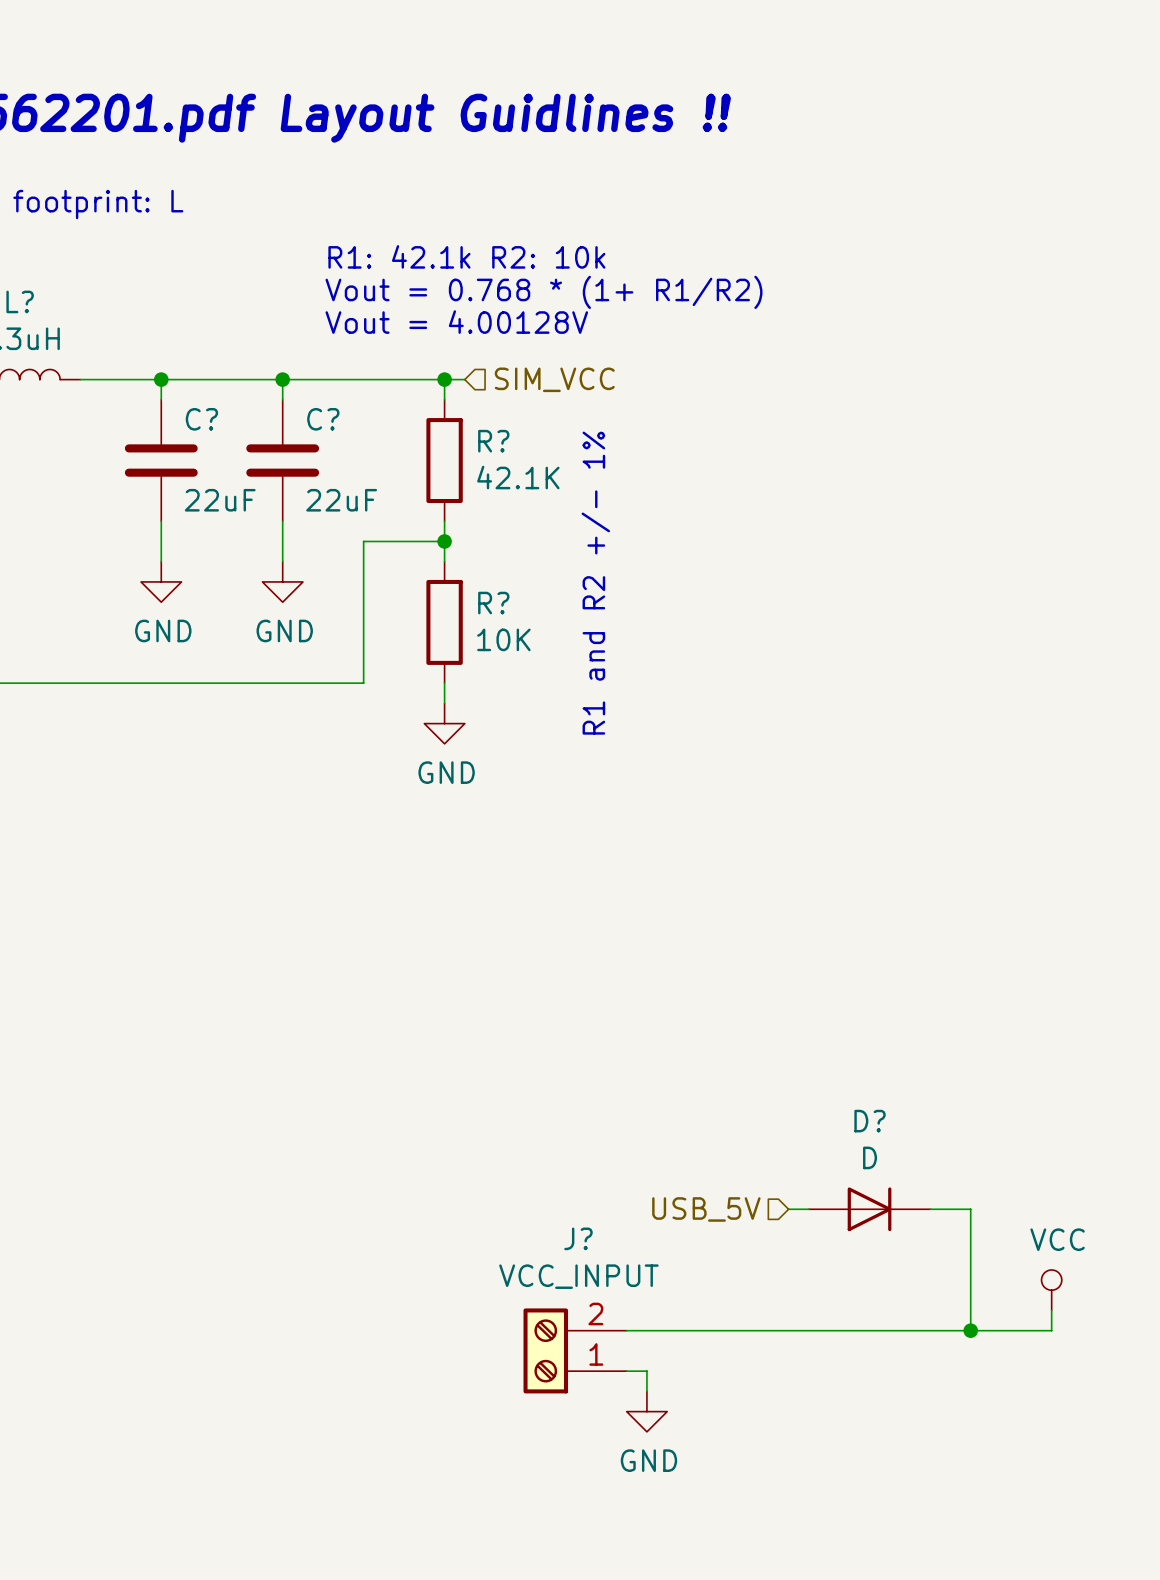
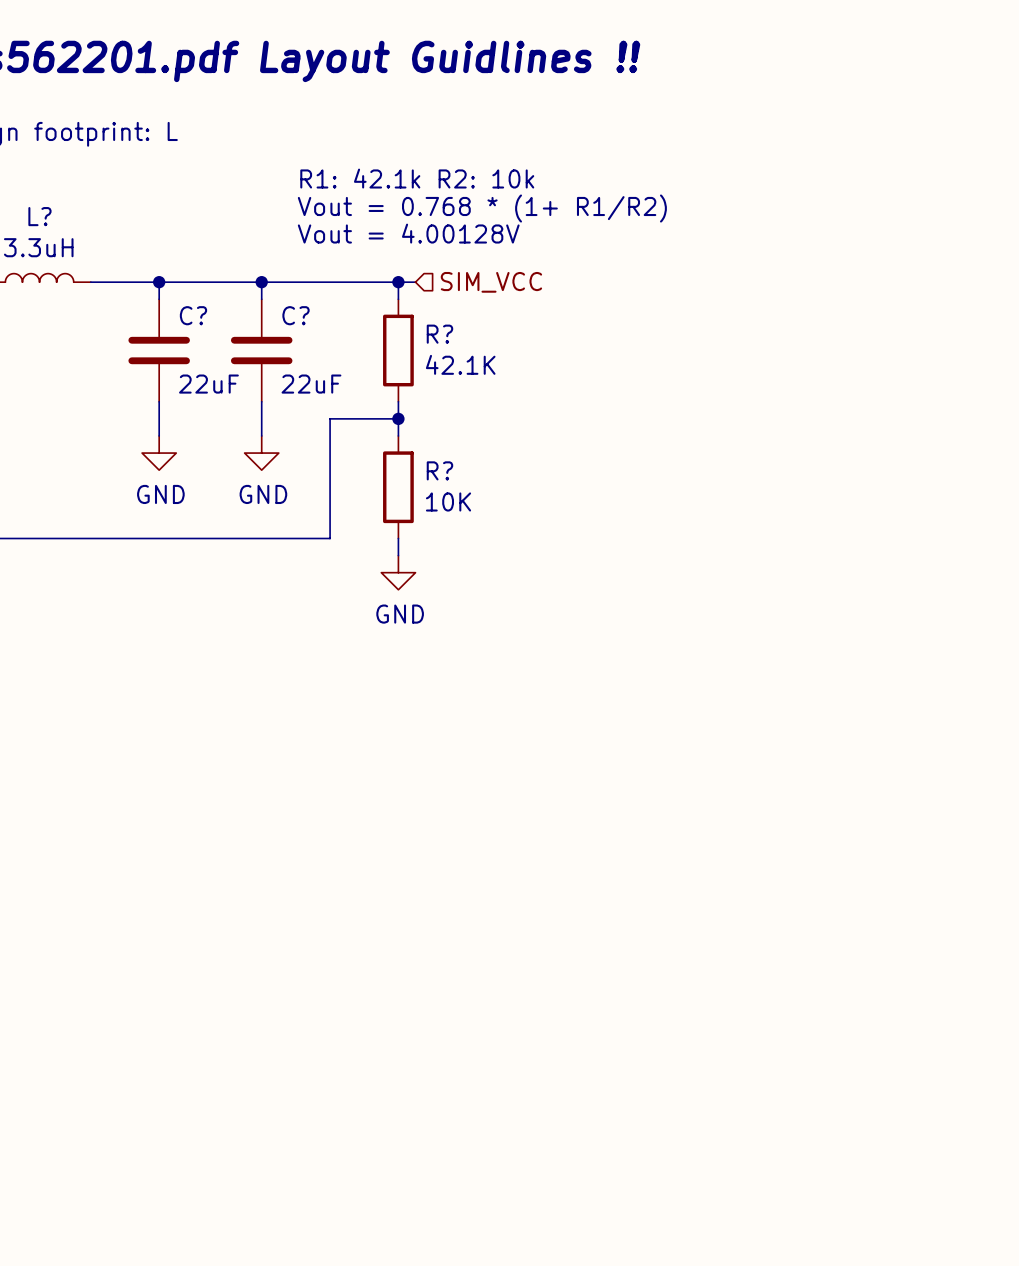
text: R1 and R2 +/- 1% (595, 583) -> none
hierarchical label: USB_5V (706, 1209) -> none
wire: (788, 1209) (808, 1209) -> none
D?: D (869, 1209) -> none
wire: (930, 1209) (970, 1209) (970, 1330) -> none
power symbol: VCC (1051, 1290) -> none
wire: (1051, 1310) (1051, 1330) (626, 1330) -> none
junction: (970, 1330) -> none
J?: VCC_INPUT (575, 1350) -> none
wire: (626, 1371) (646, 1371) (646, 1391) -> none
power symbol: GND (646, 1411) -> none

